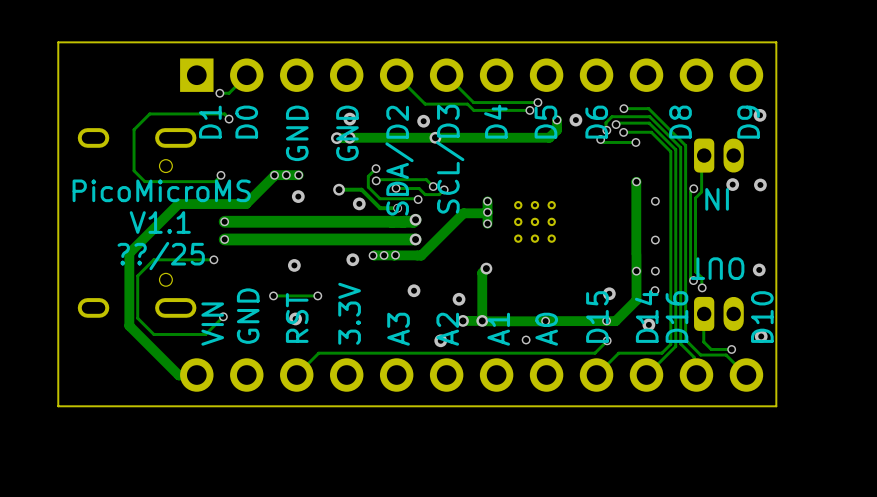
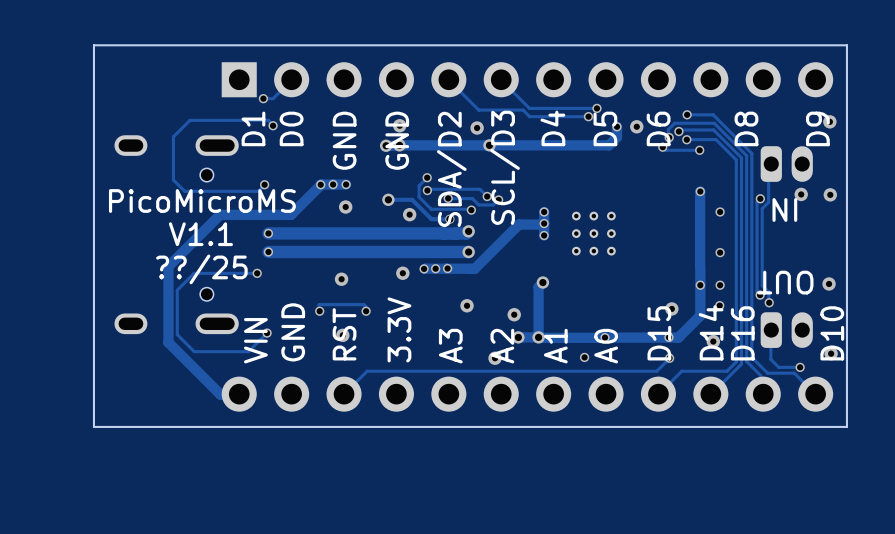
track: none -> (318, 305) (363, 304) (366, 306)
track: (317, 295) (273, 295) -> none

